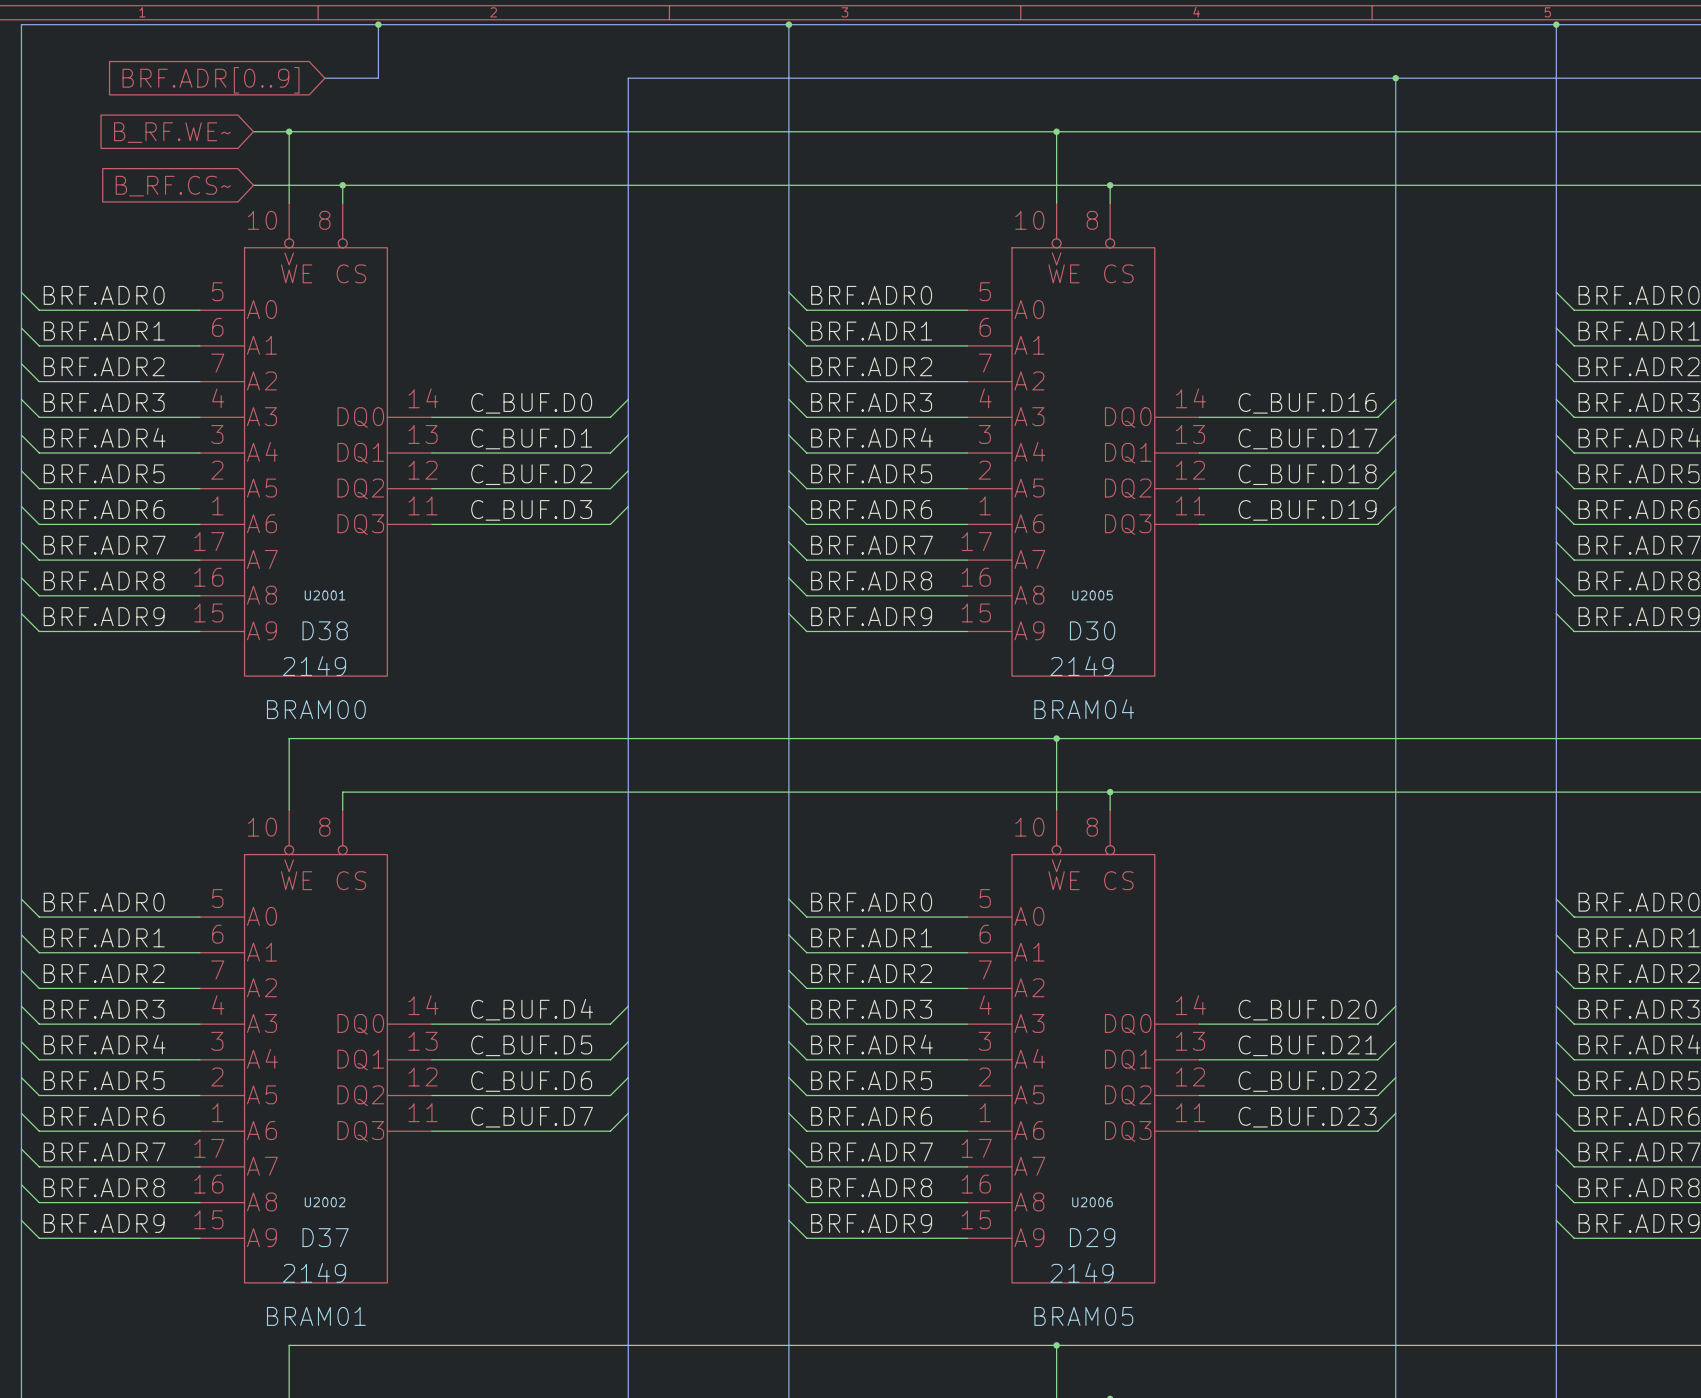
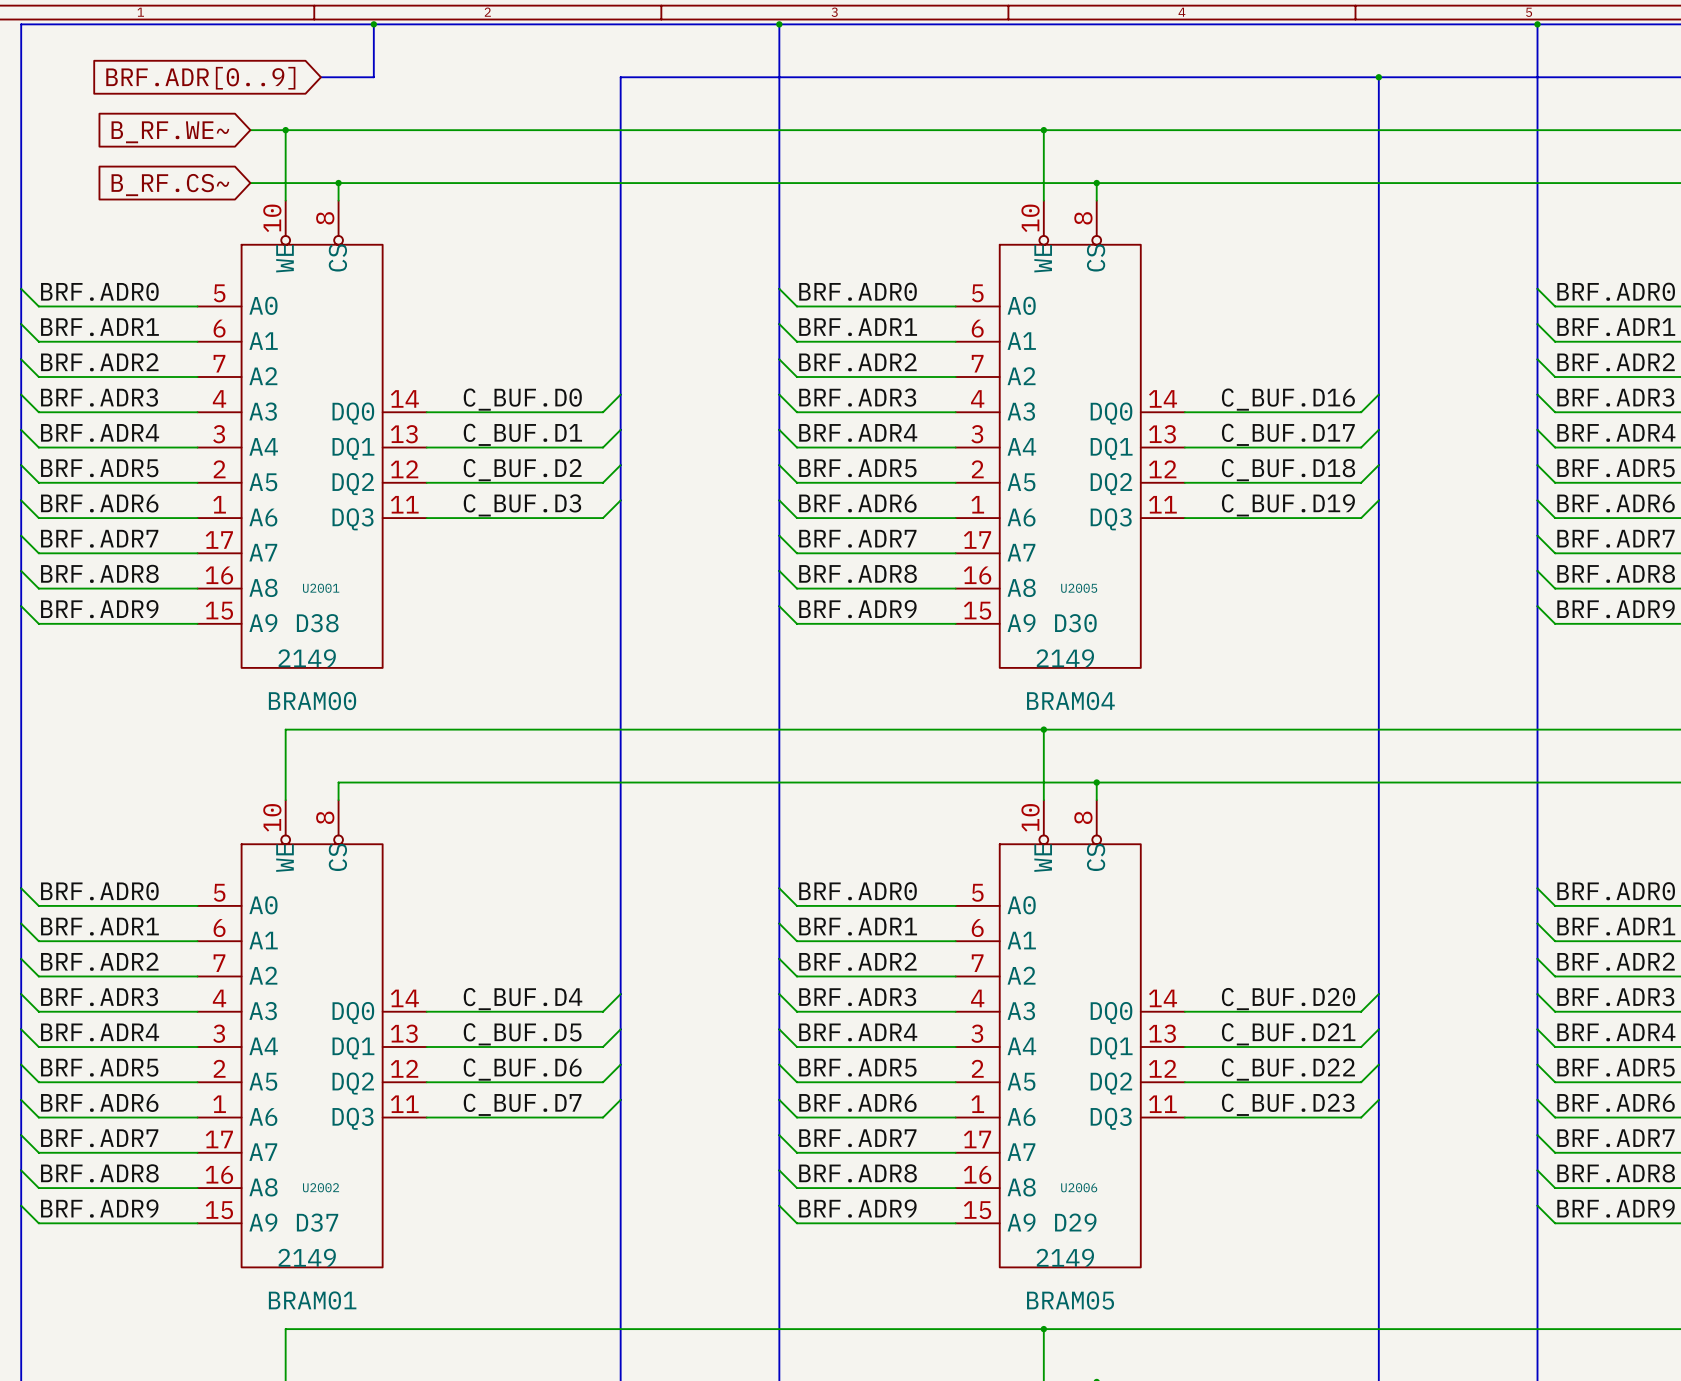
U2001 symbol: [199, 203, 432, 677] -> [197, 200, 427, 668]
U2005 symbol: [967, 203, 1200, 677] -> [955, 200, 1185, 668]
U2002 symbol: [199, 809, 432, 1283] -> [197, 800, 427, 1268]
U2006 symbol: [967, 809, 1200, 1283] -> [955, 800, 1185, 1268]

